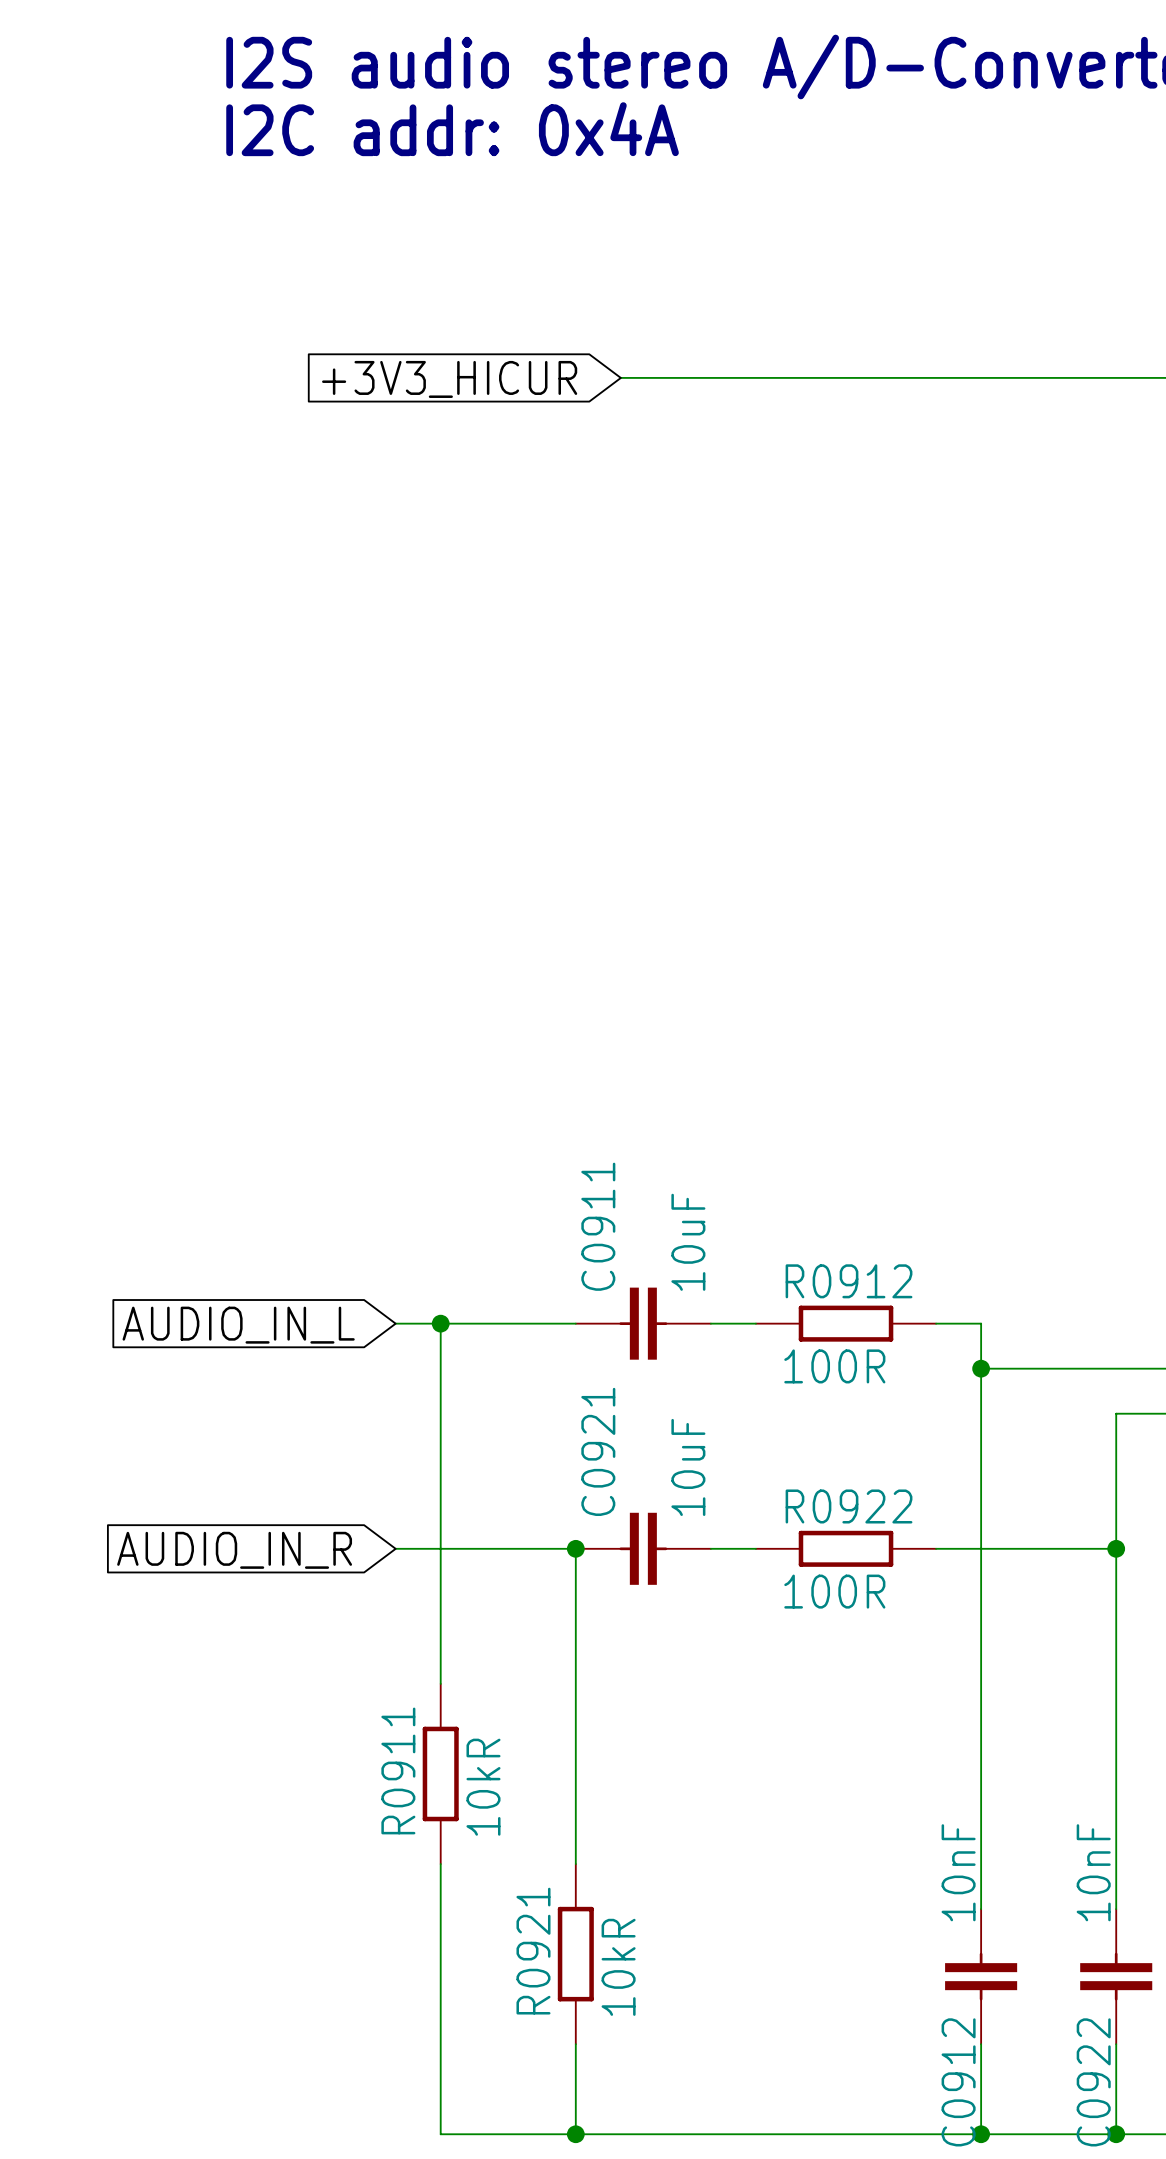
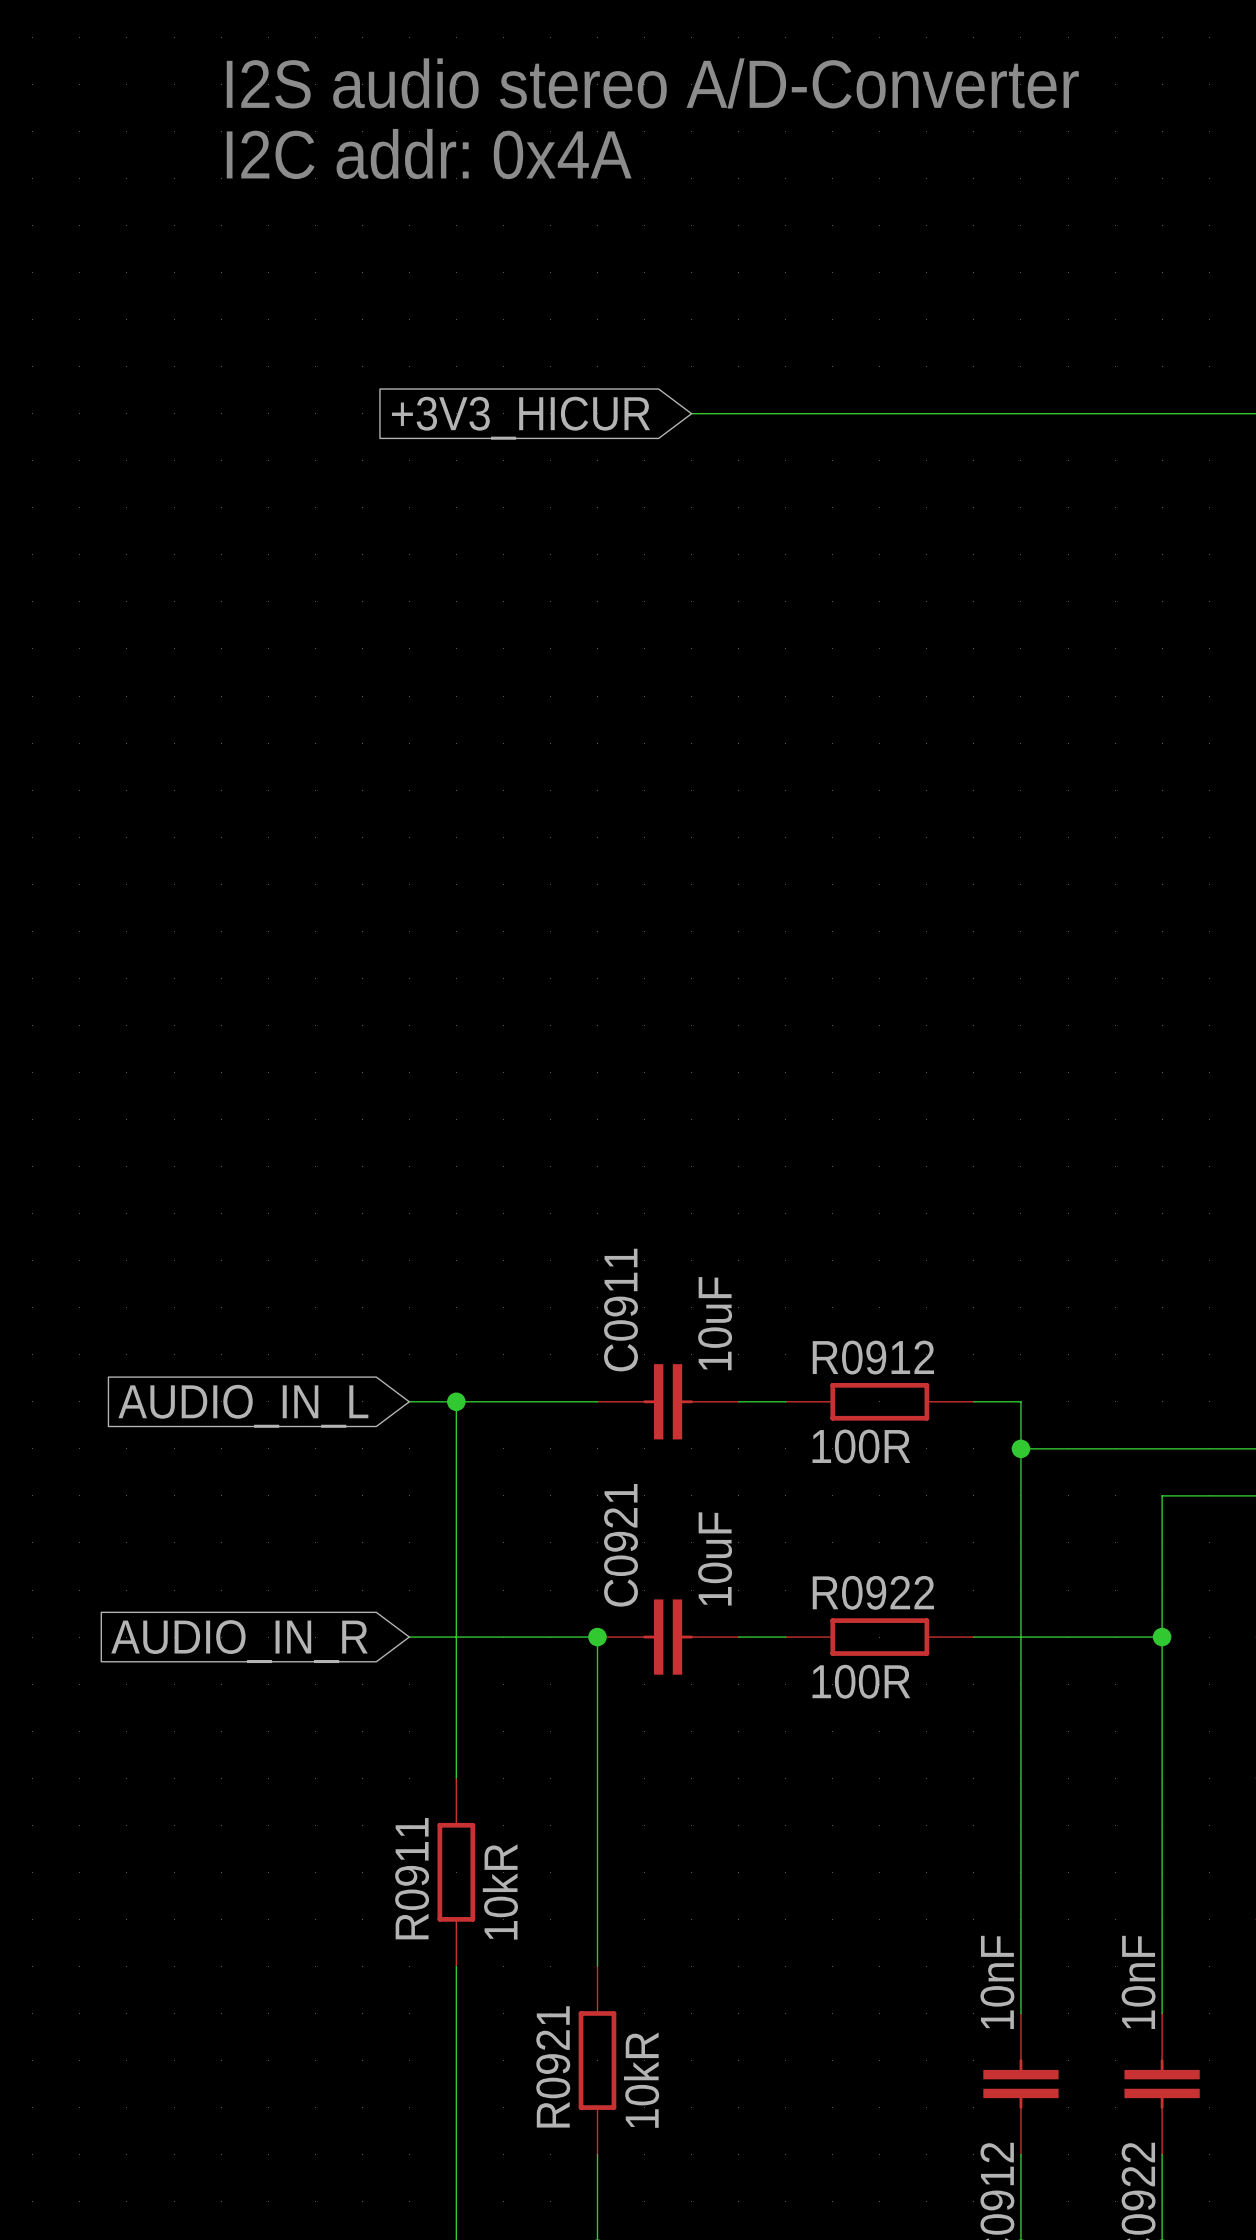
wire: (620, 377) (665, 377) -> none
global label position: +3V3_HICUR (449, 379) -> +3V3_HICUR (521, 418)

